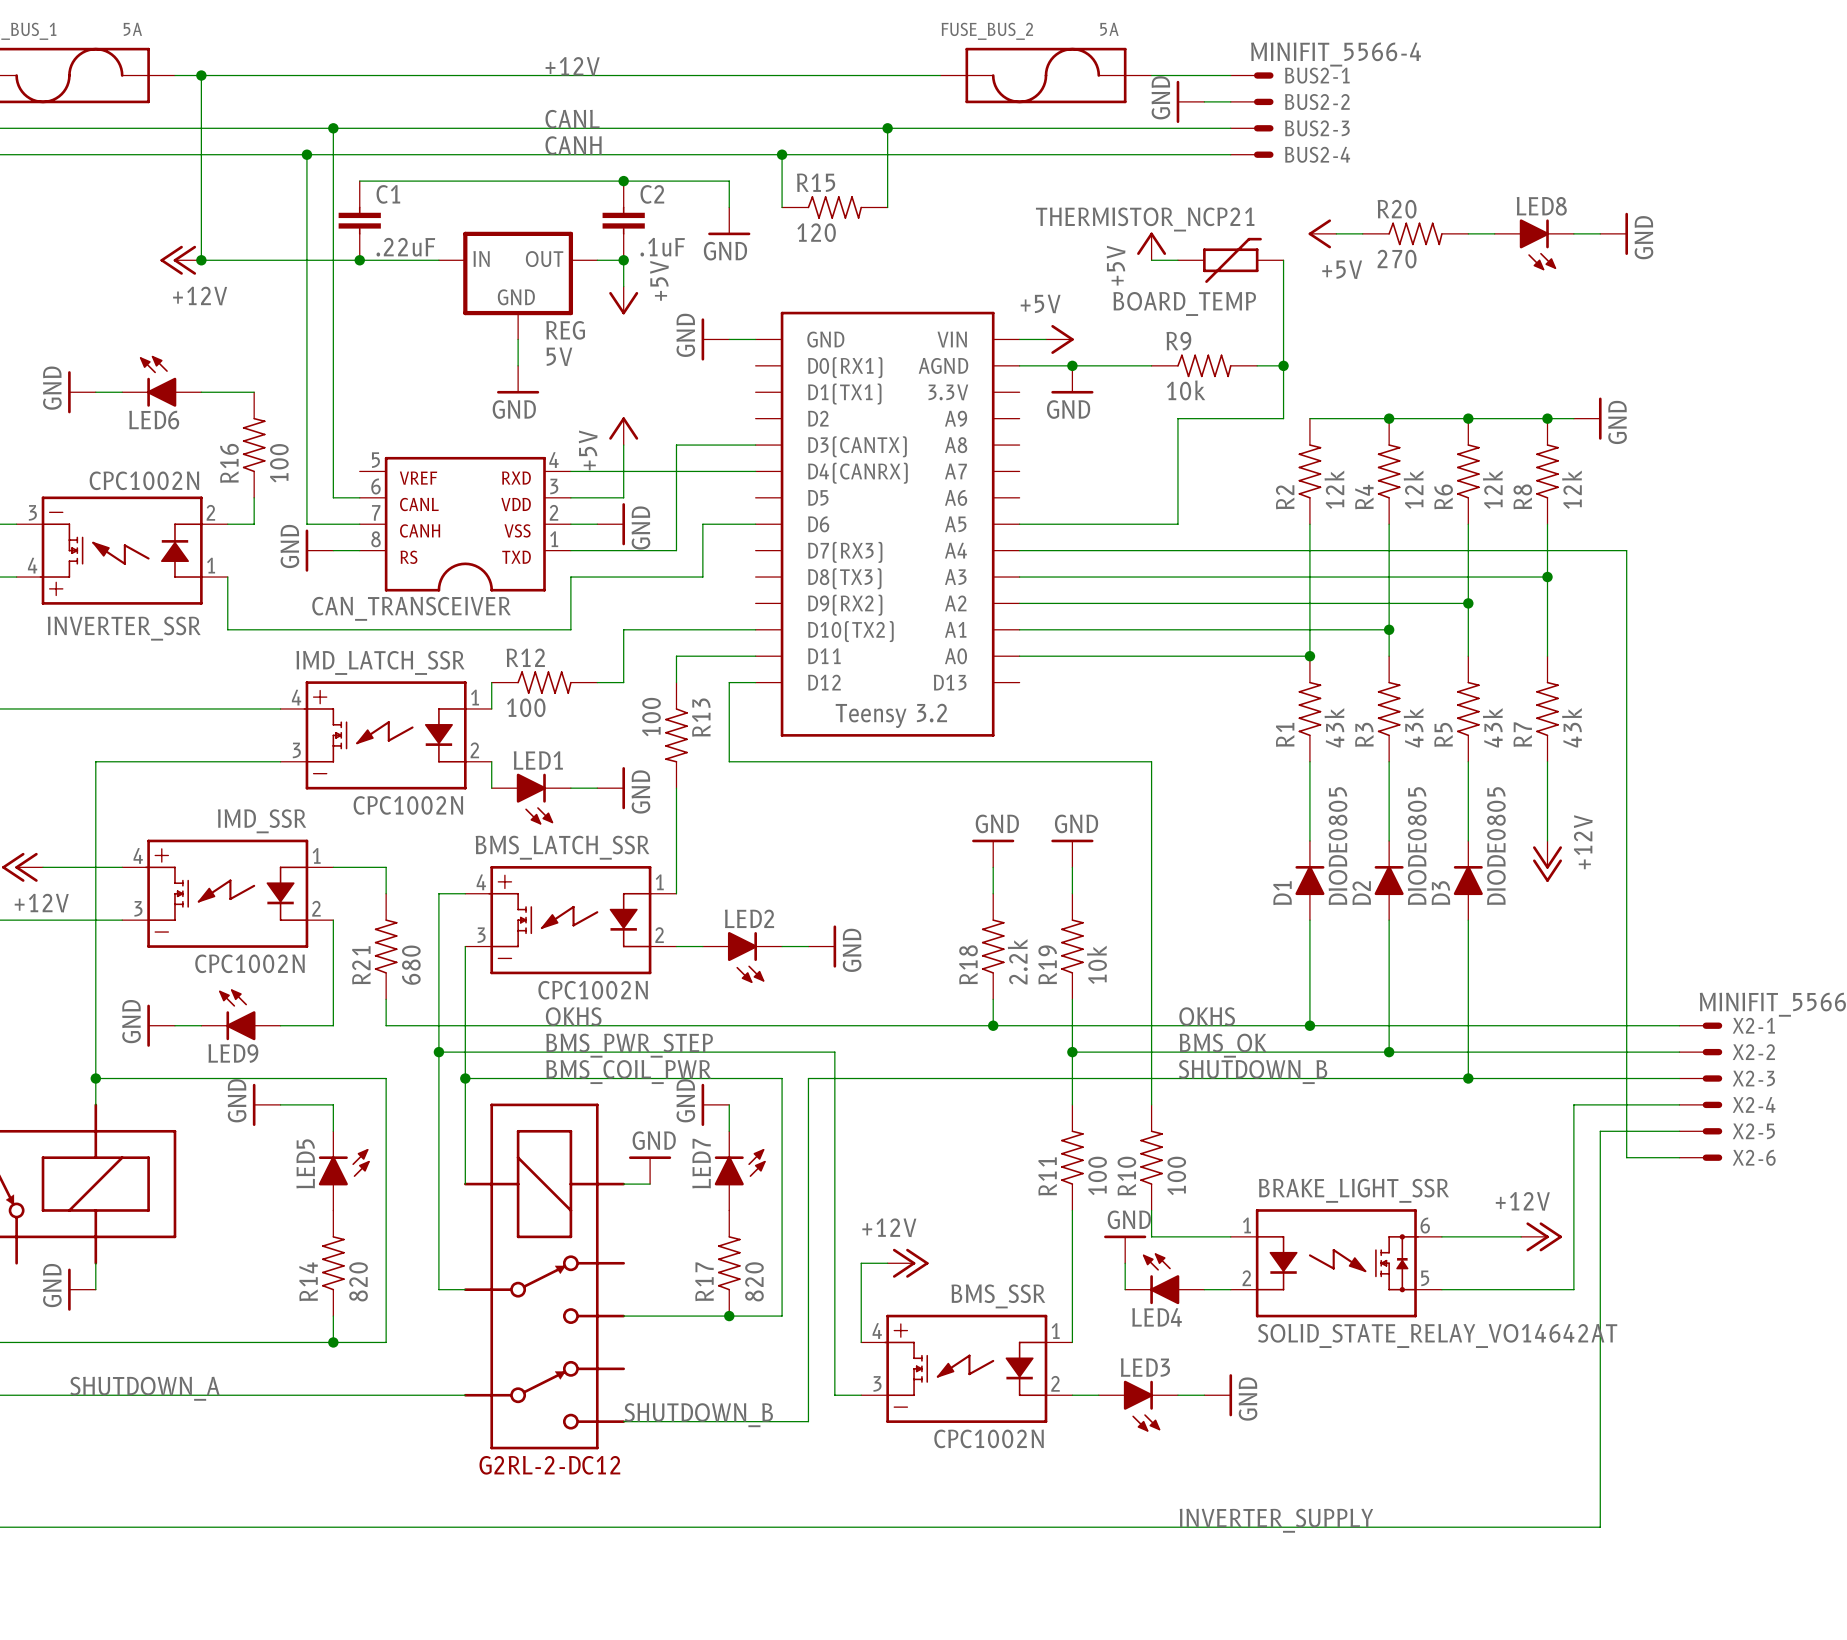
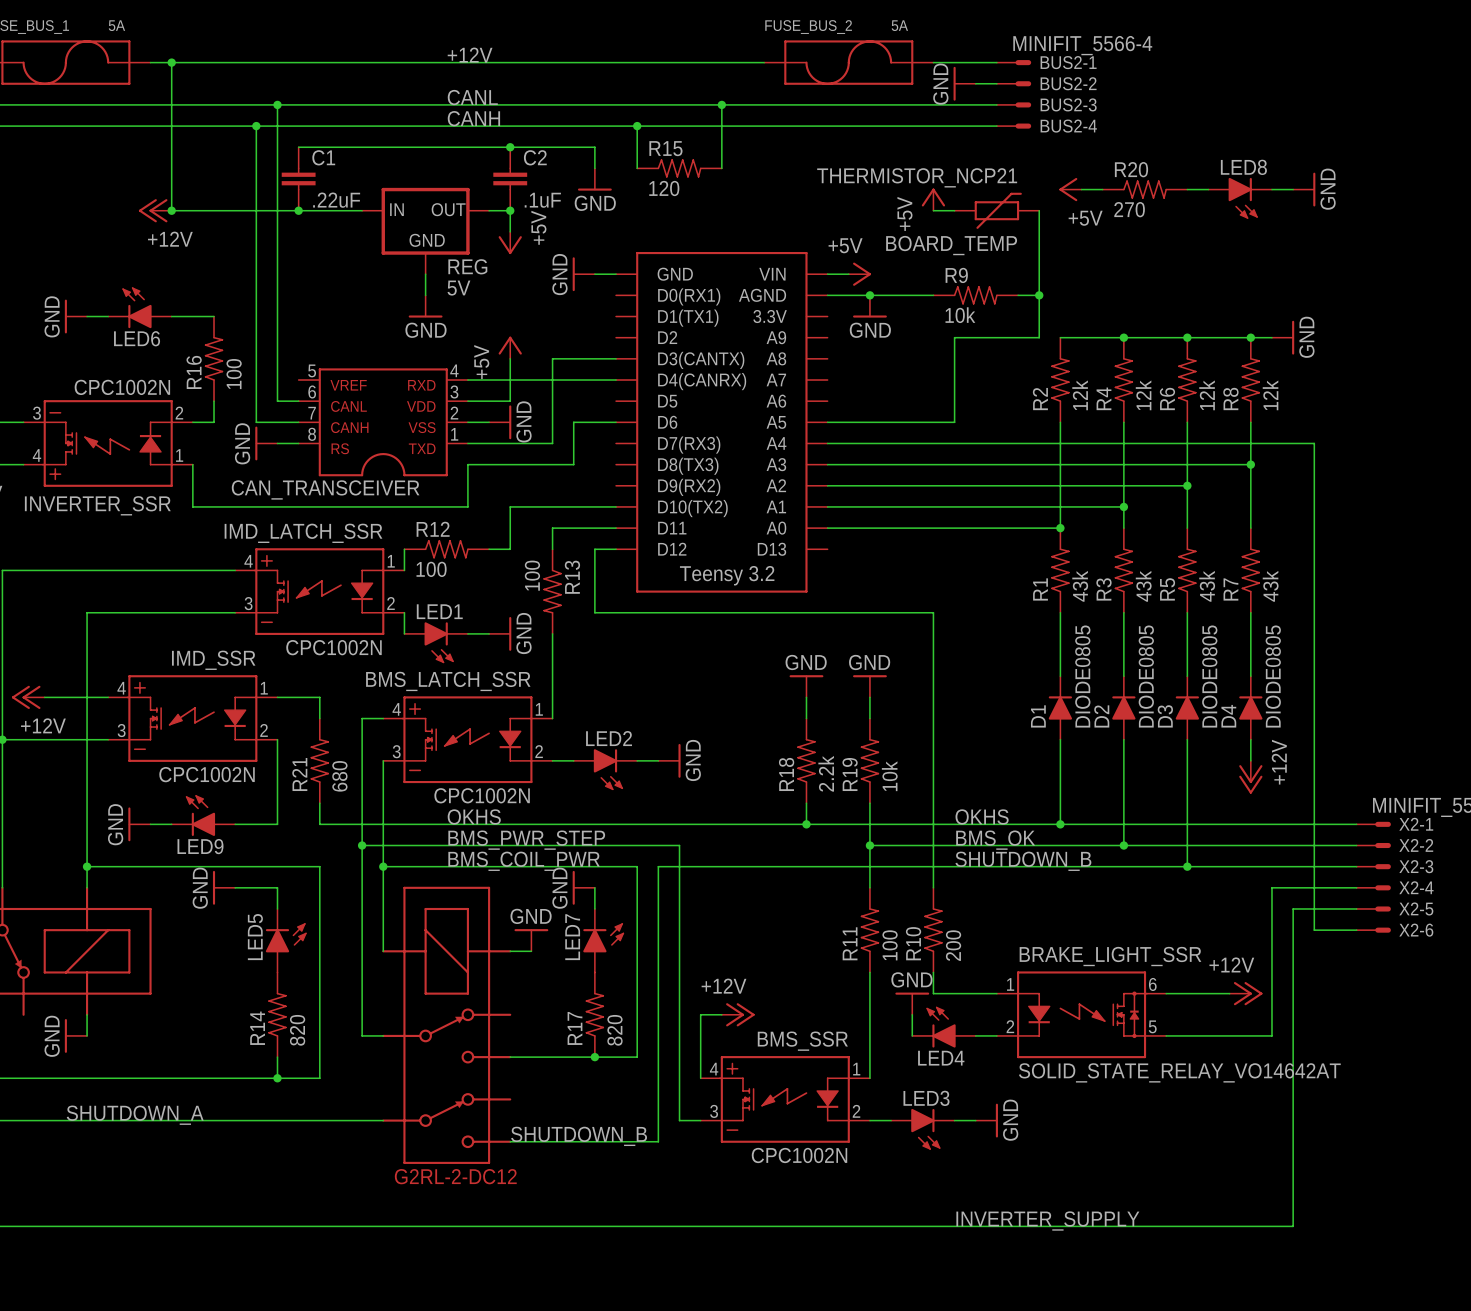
power symbol position: +12V (1547, 861) -> +12V (1250, 777)
D4: none -> DIODE0805 (1250, 707)
wire: none -> (1250, 739) (1250, 760)
R10 value: 100 (1176, 1175) -> 200 (953, 945)

